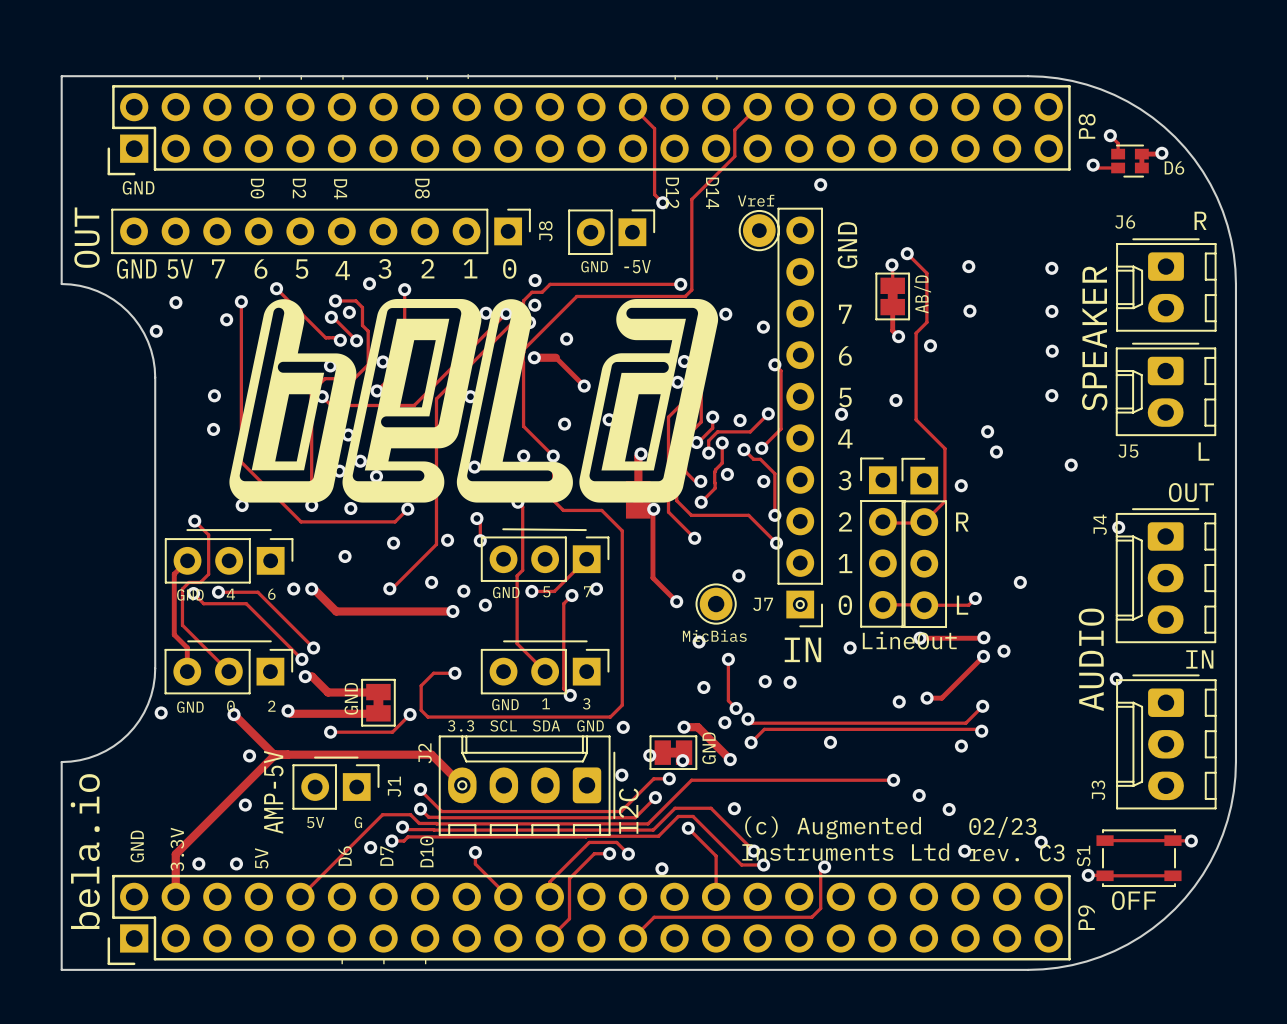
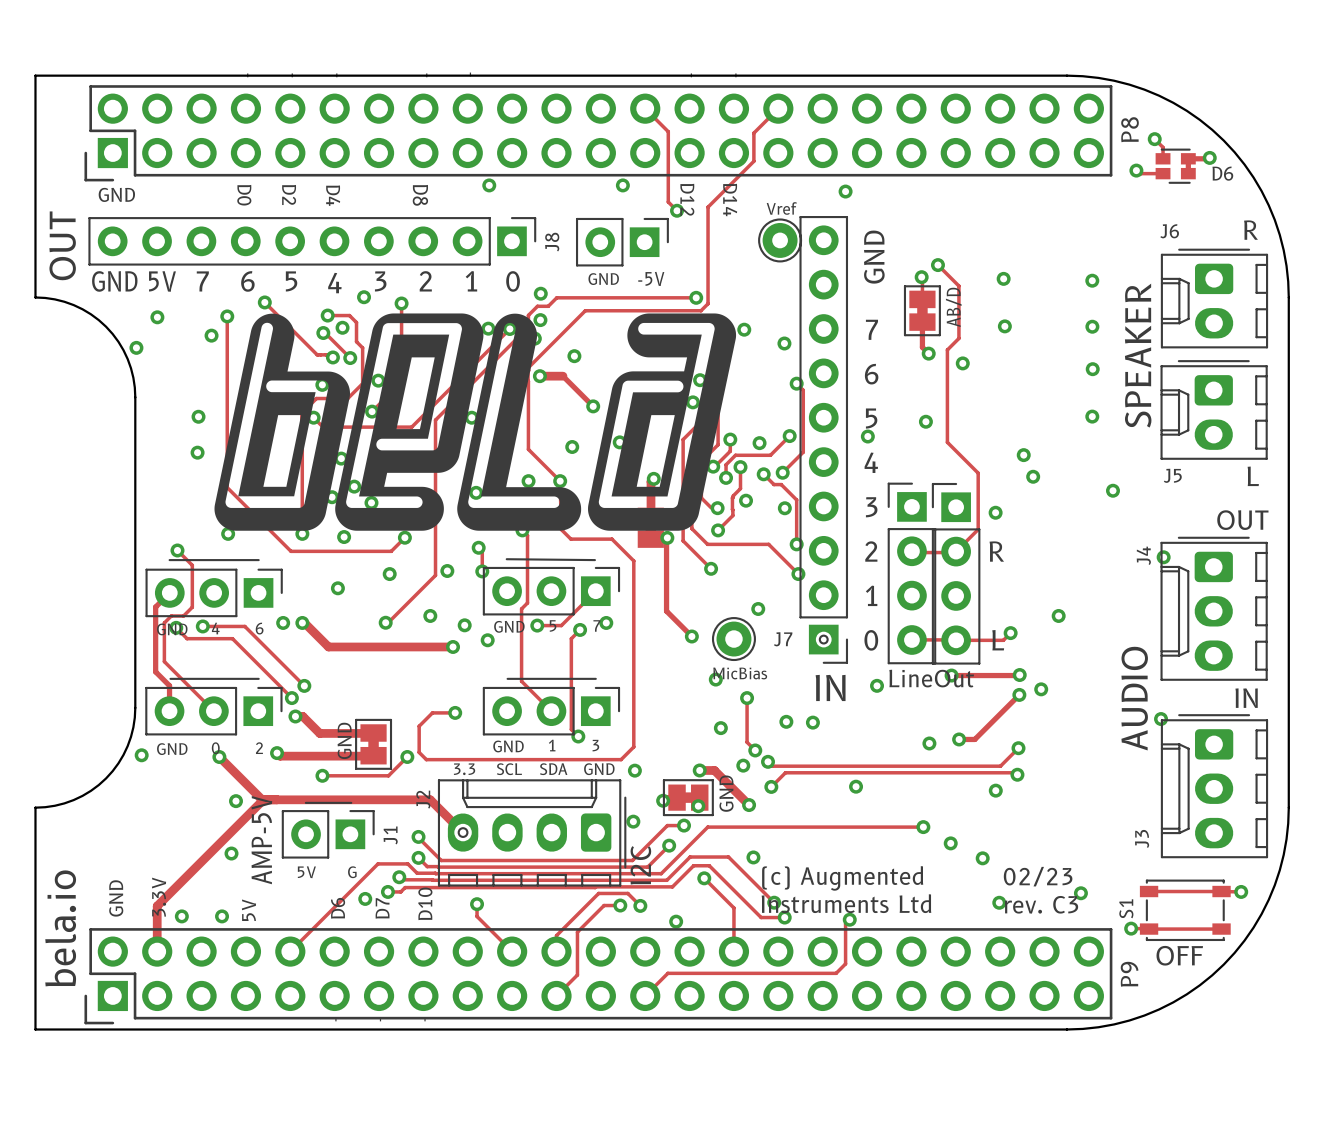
via: none -> (489, 185)
via: none -> (622, 185)

